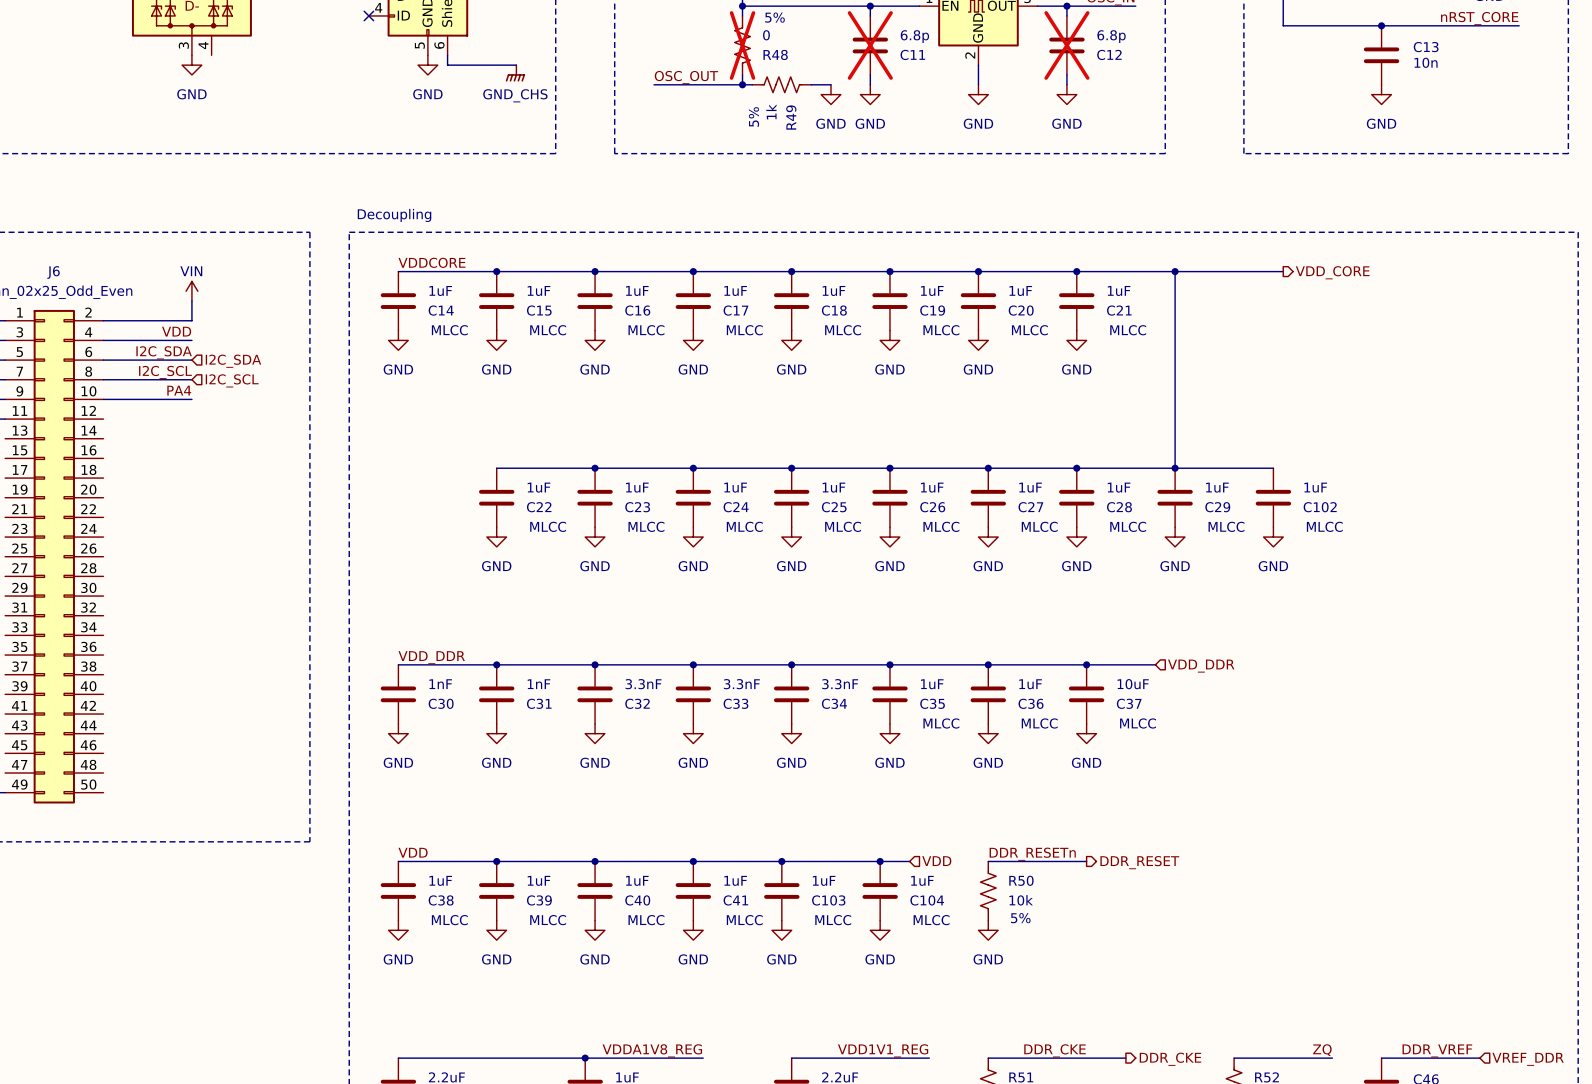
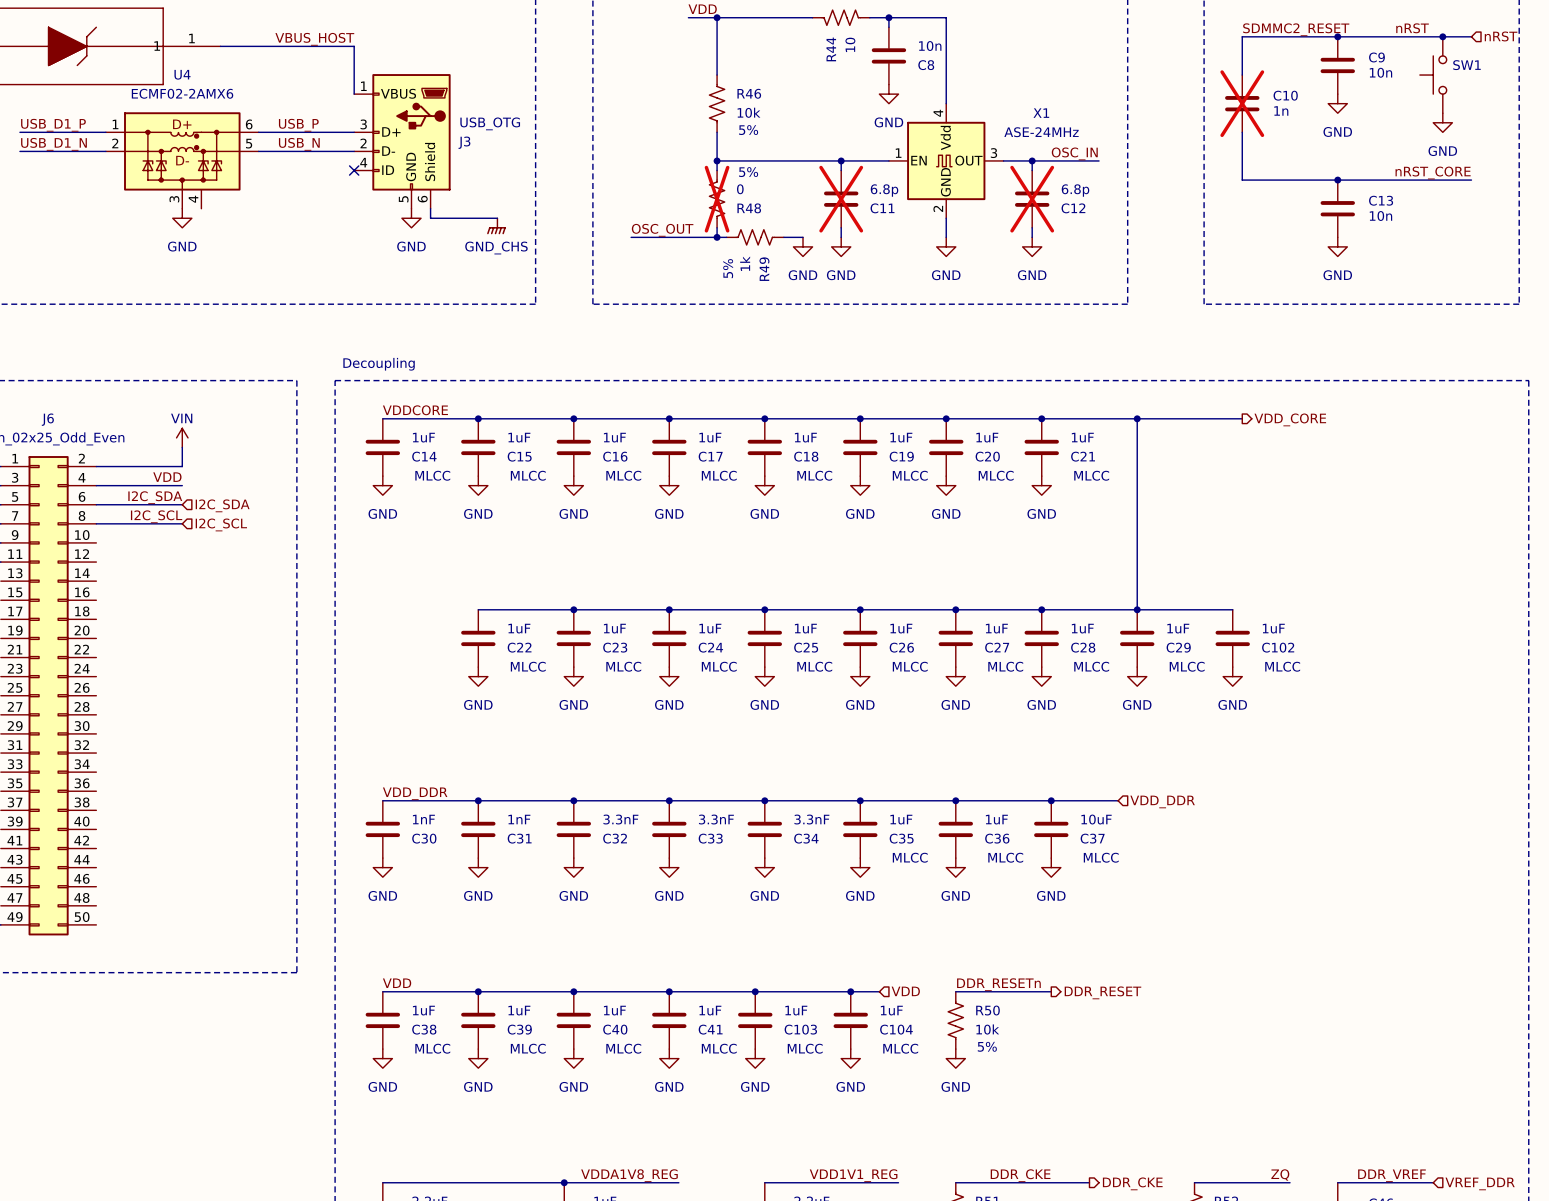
label: PA4 (179, 390) -> none
wire: (103, 399) (191, 399) -> none

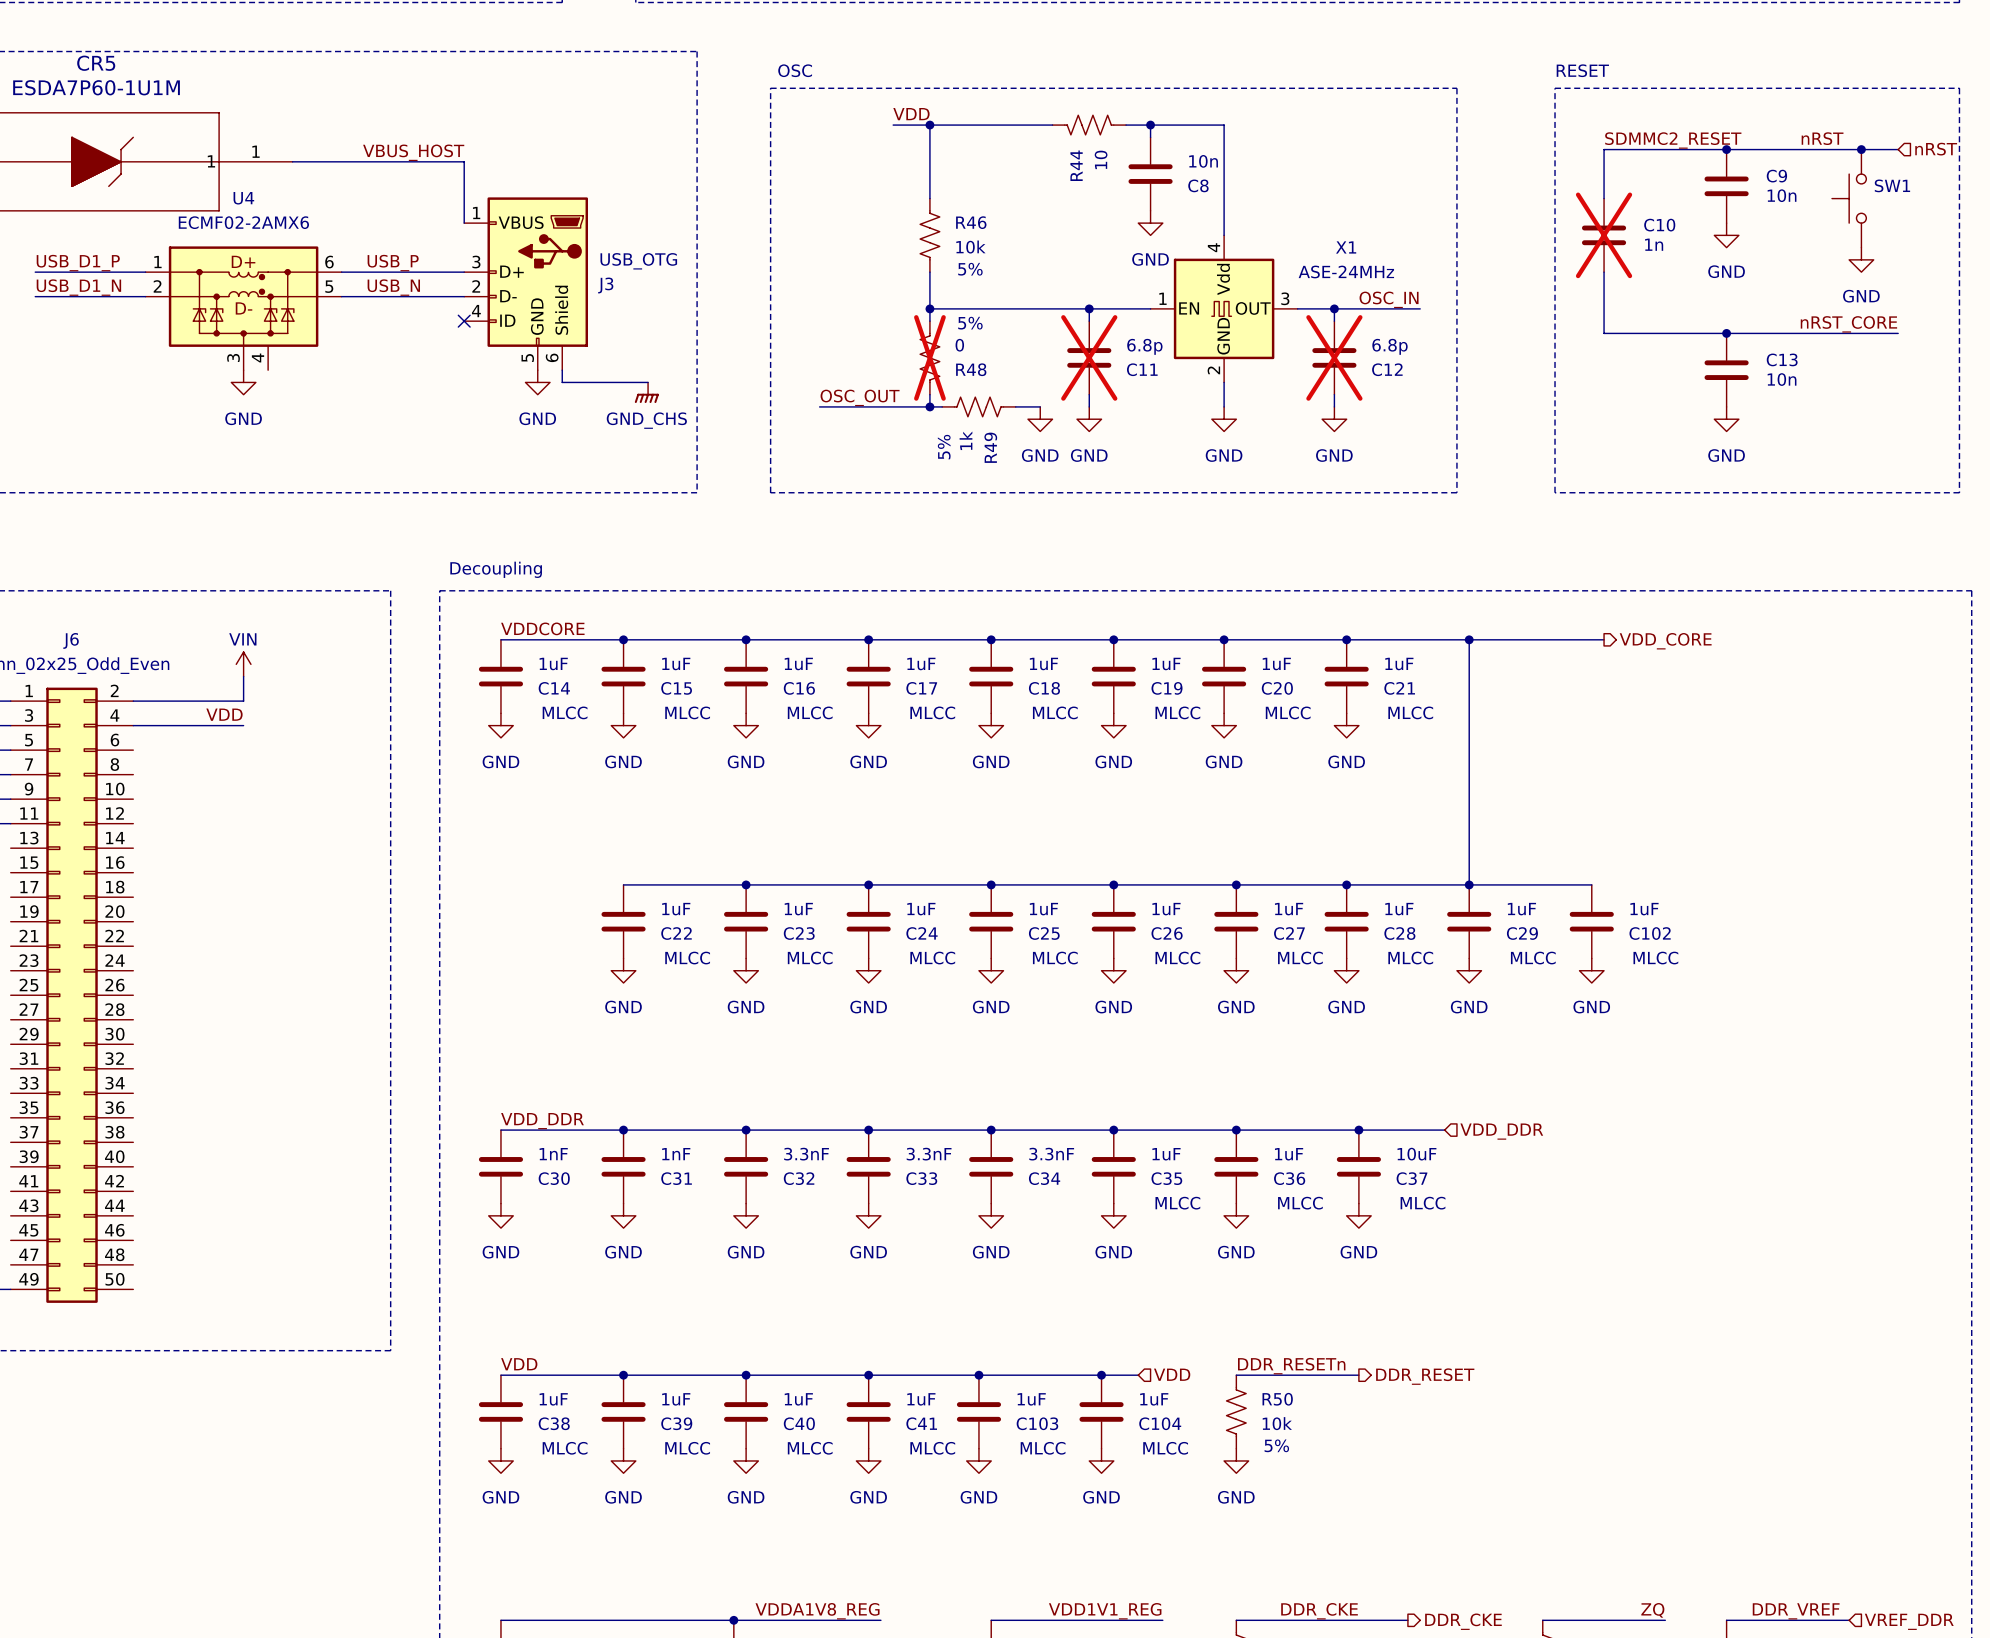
label: I2C_SDA (155, 497) -> none
wire: (96, 504) (182, 504) -> none
hierarchical label: I2C_SDA (222, 505) -> none
label: I2C_SCL (156, 516) -> none
wire: (96, 523) (182, 523) -> none
hierarchical label: I2C_SCL (221, 524) -> none

